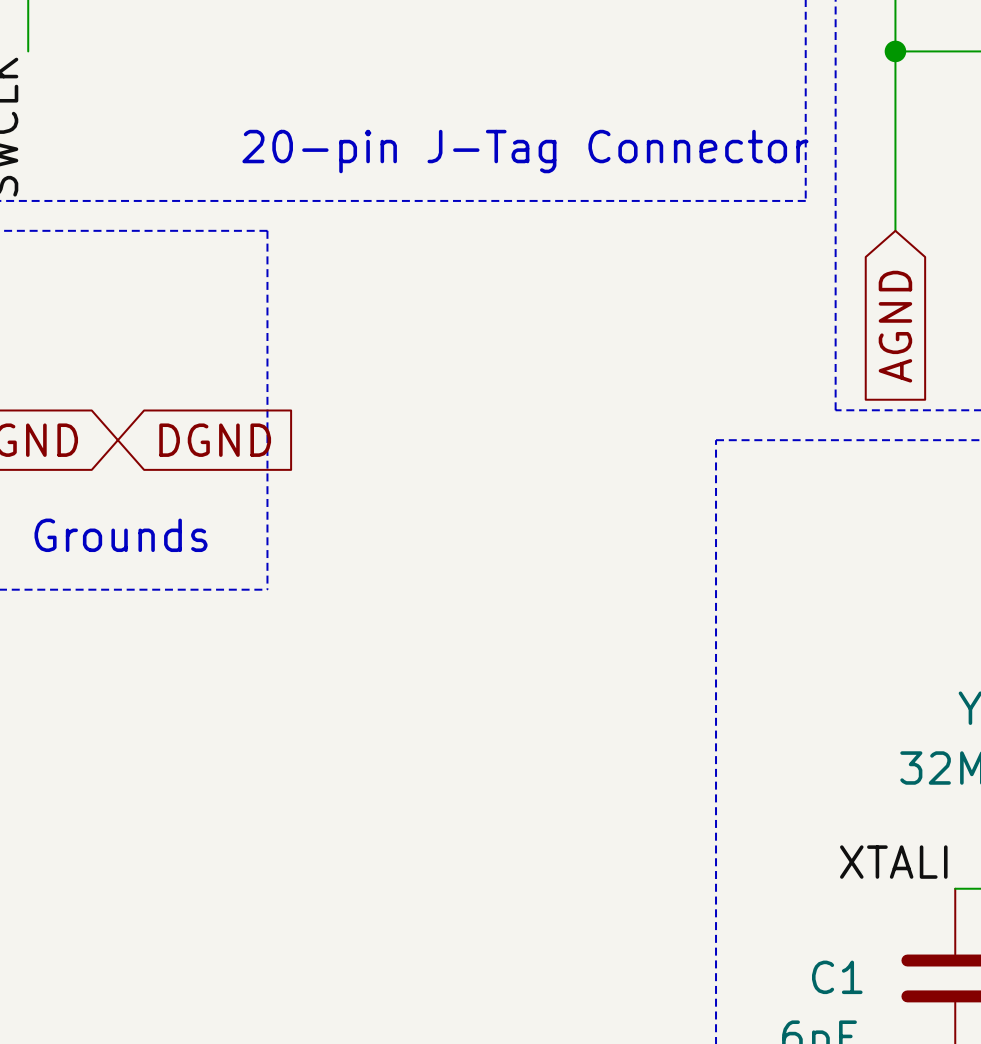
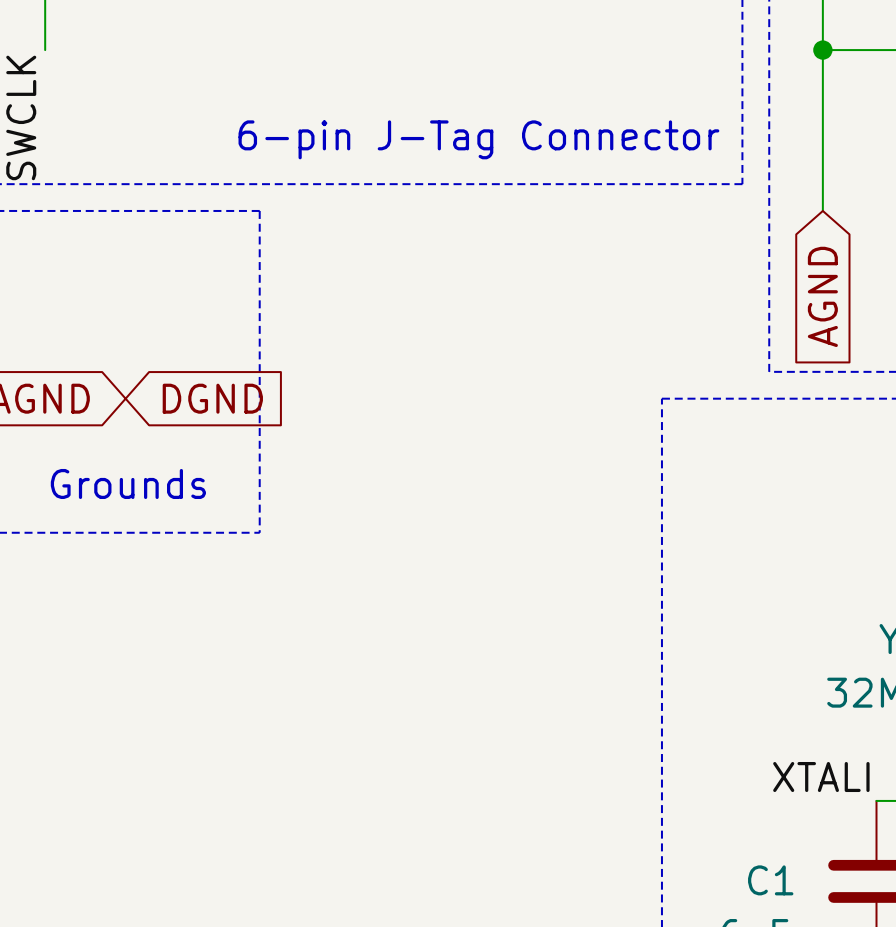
text: 20-pin J-Tag Connector (525, 151) -> 6-pin J-Tag Connector (478, 139)

